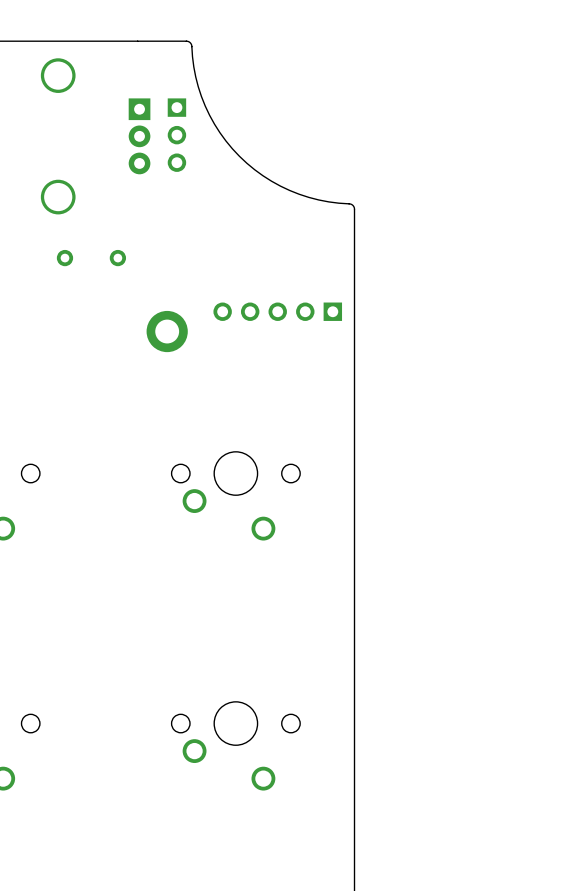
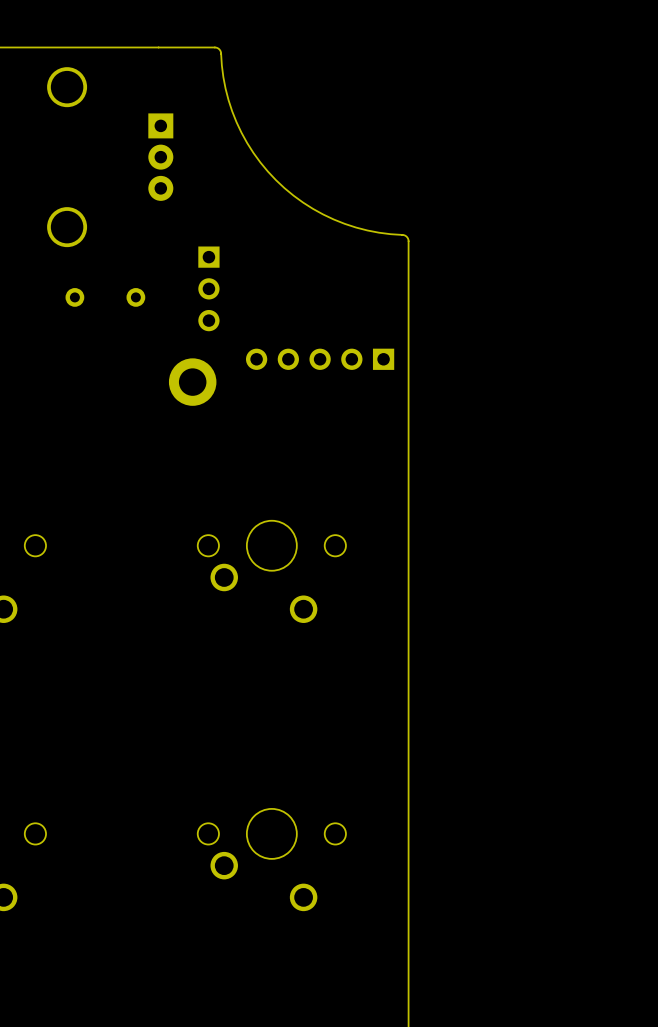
part position: (176, 135) -> (208, 288)

